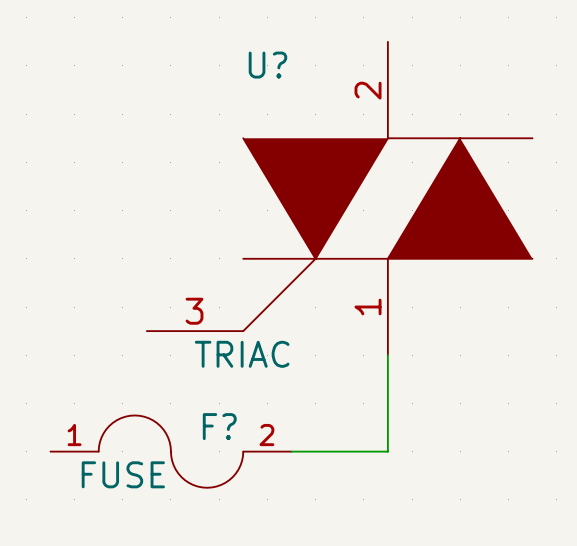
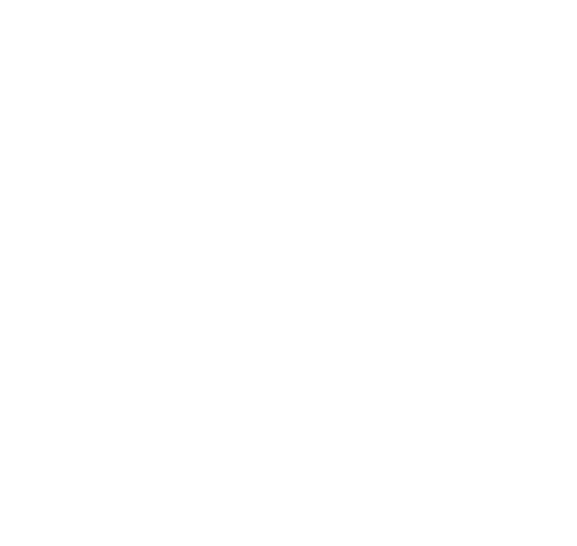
U?: TRIAC (339, 198) -> none
wire: (387, 355) (387, 451) (291, 451) -> none
F?: FUSE (170, 451) -> none

